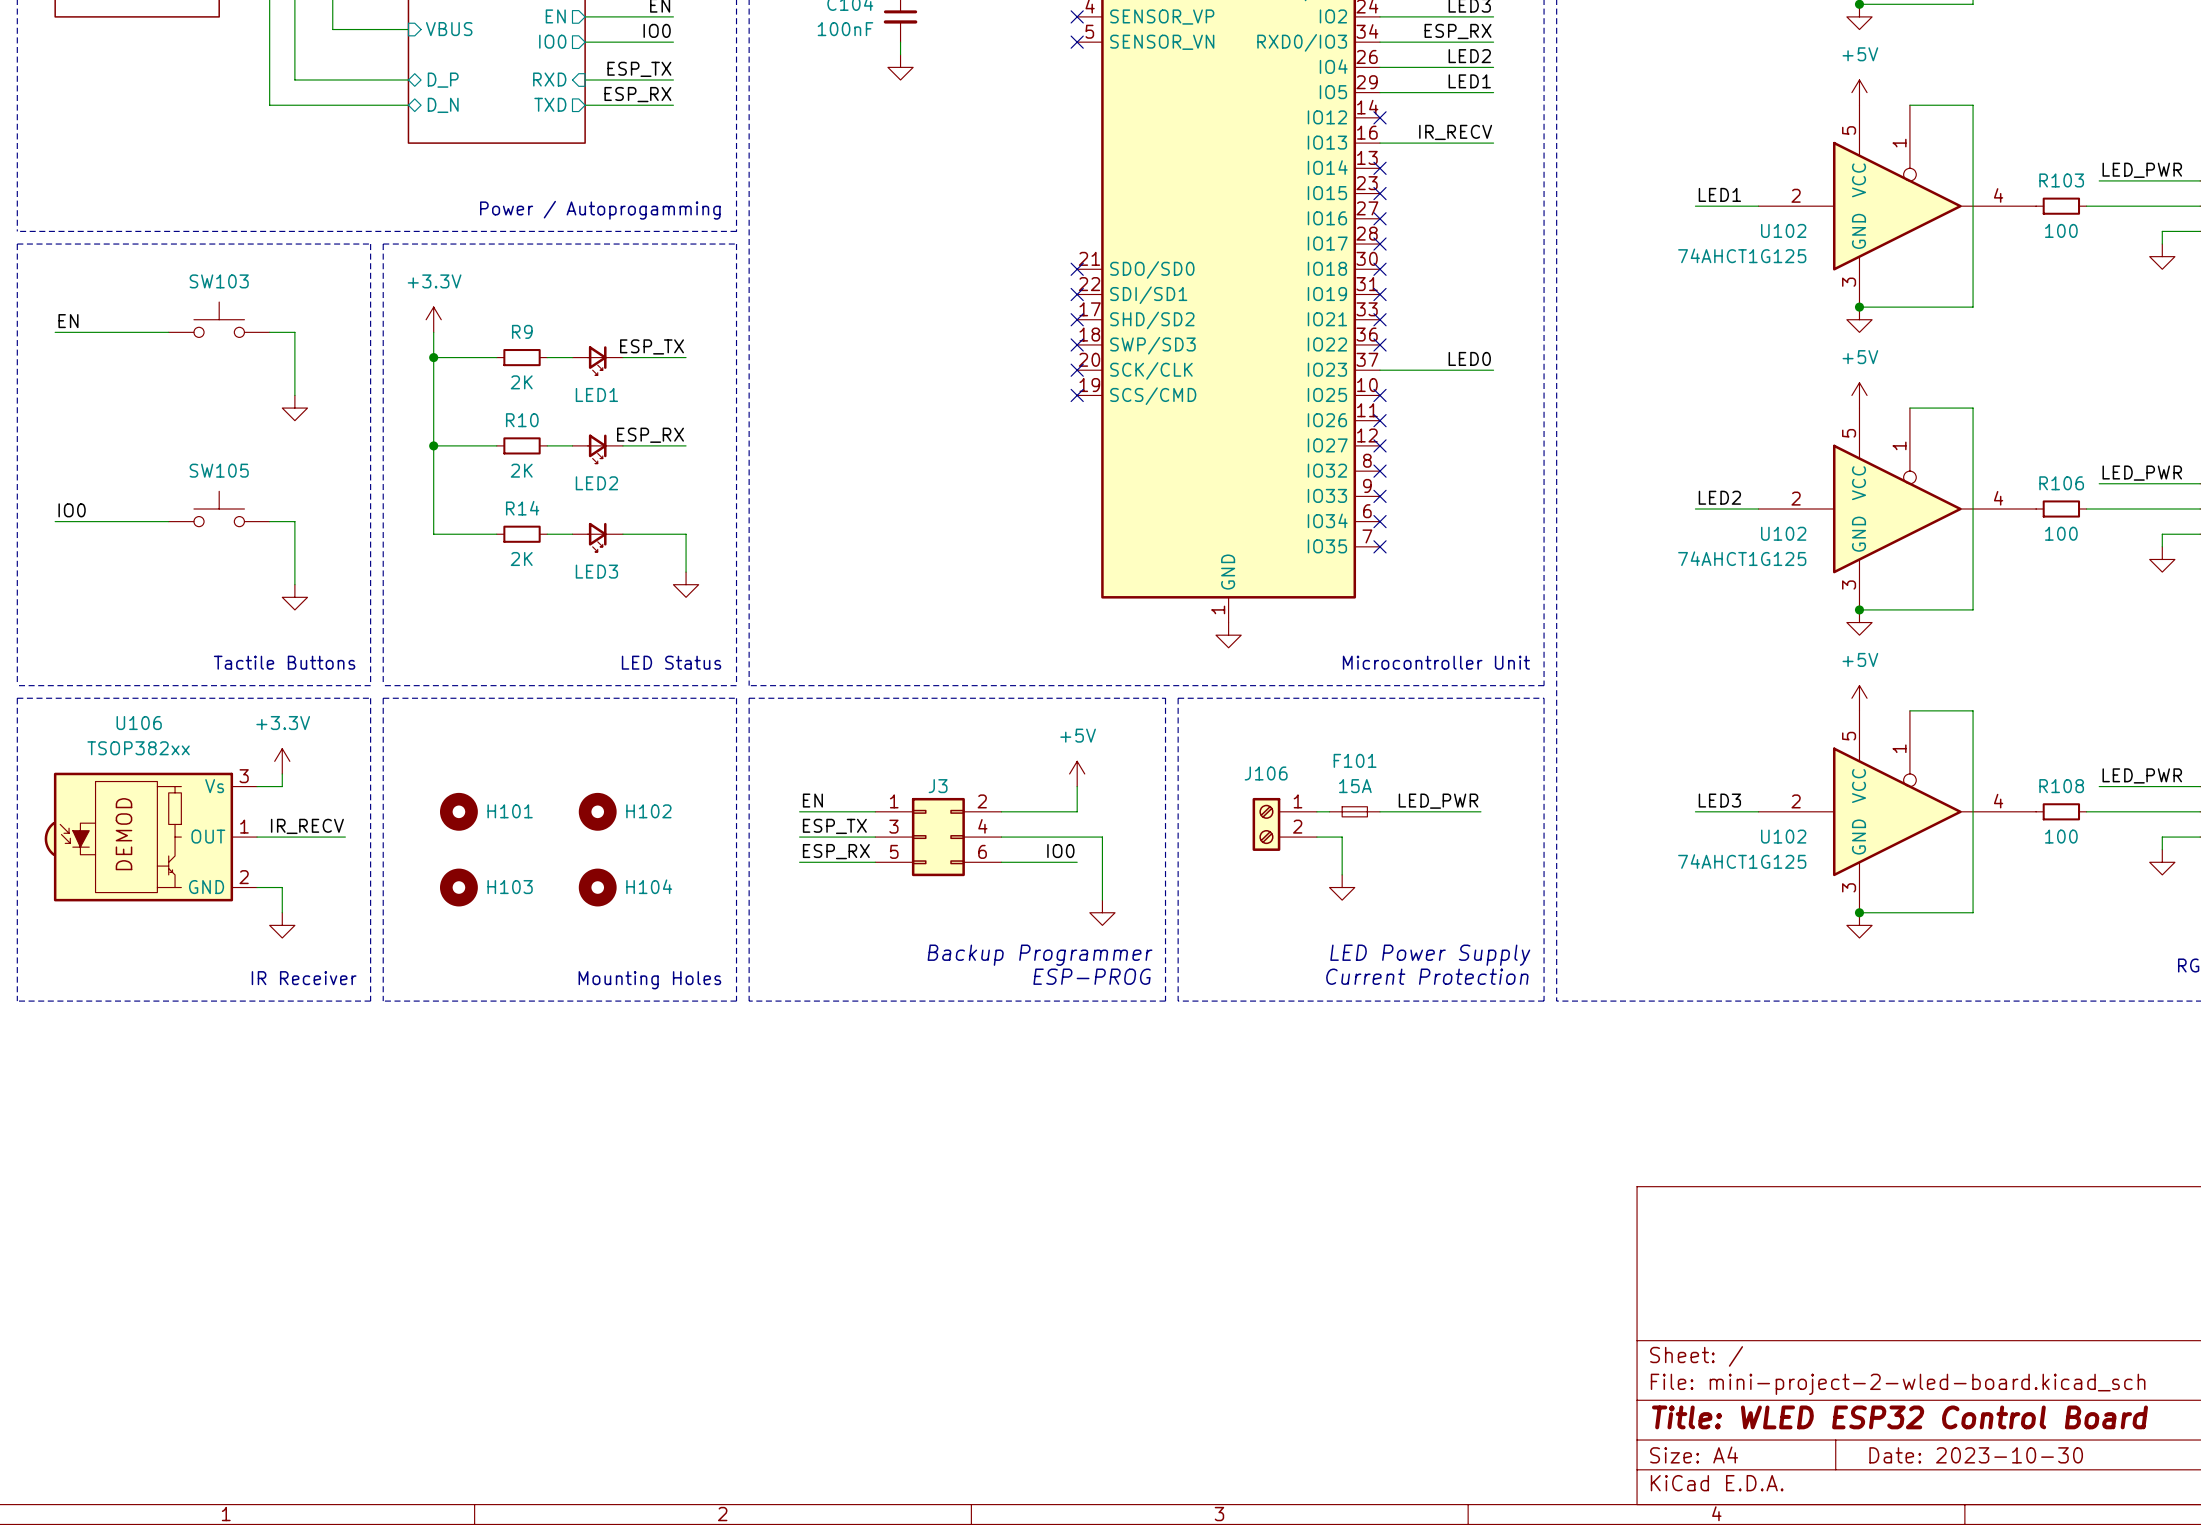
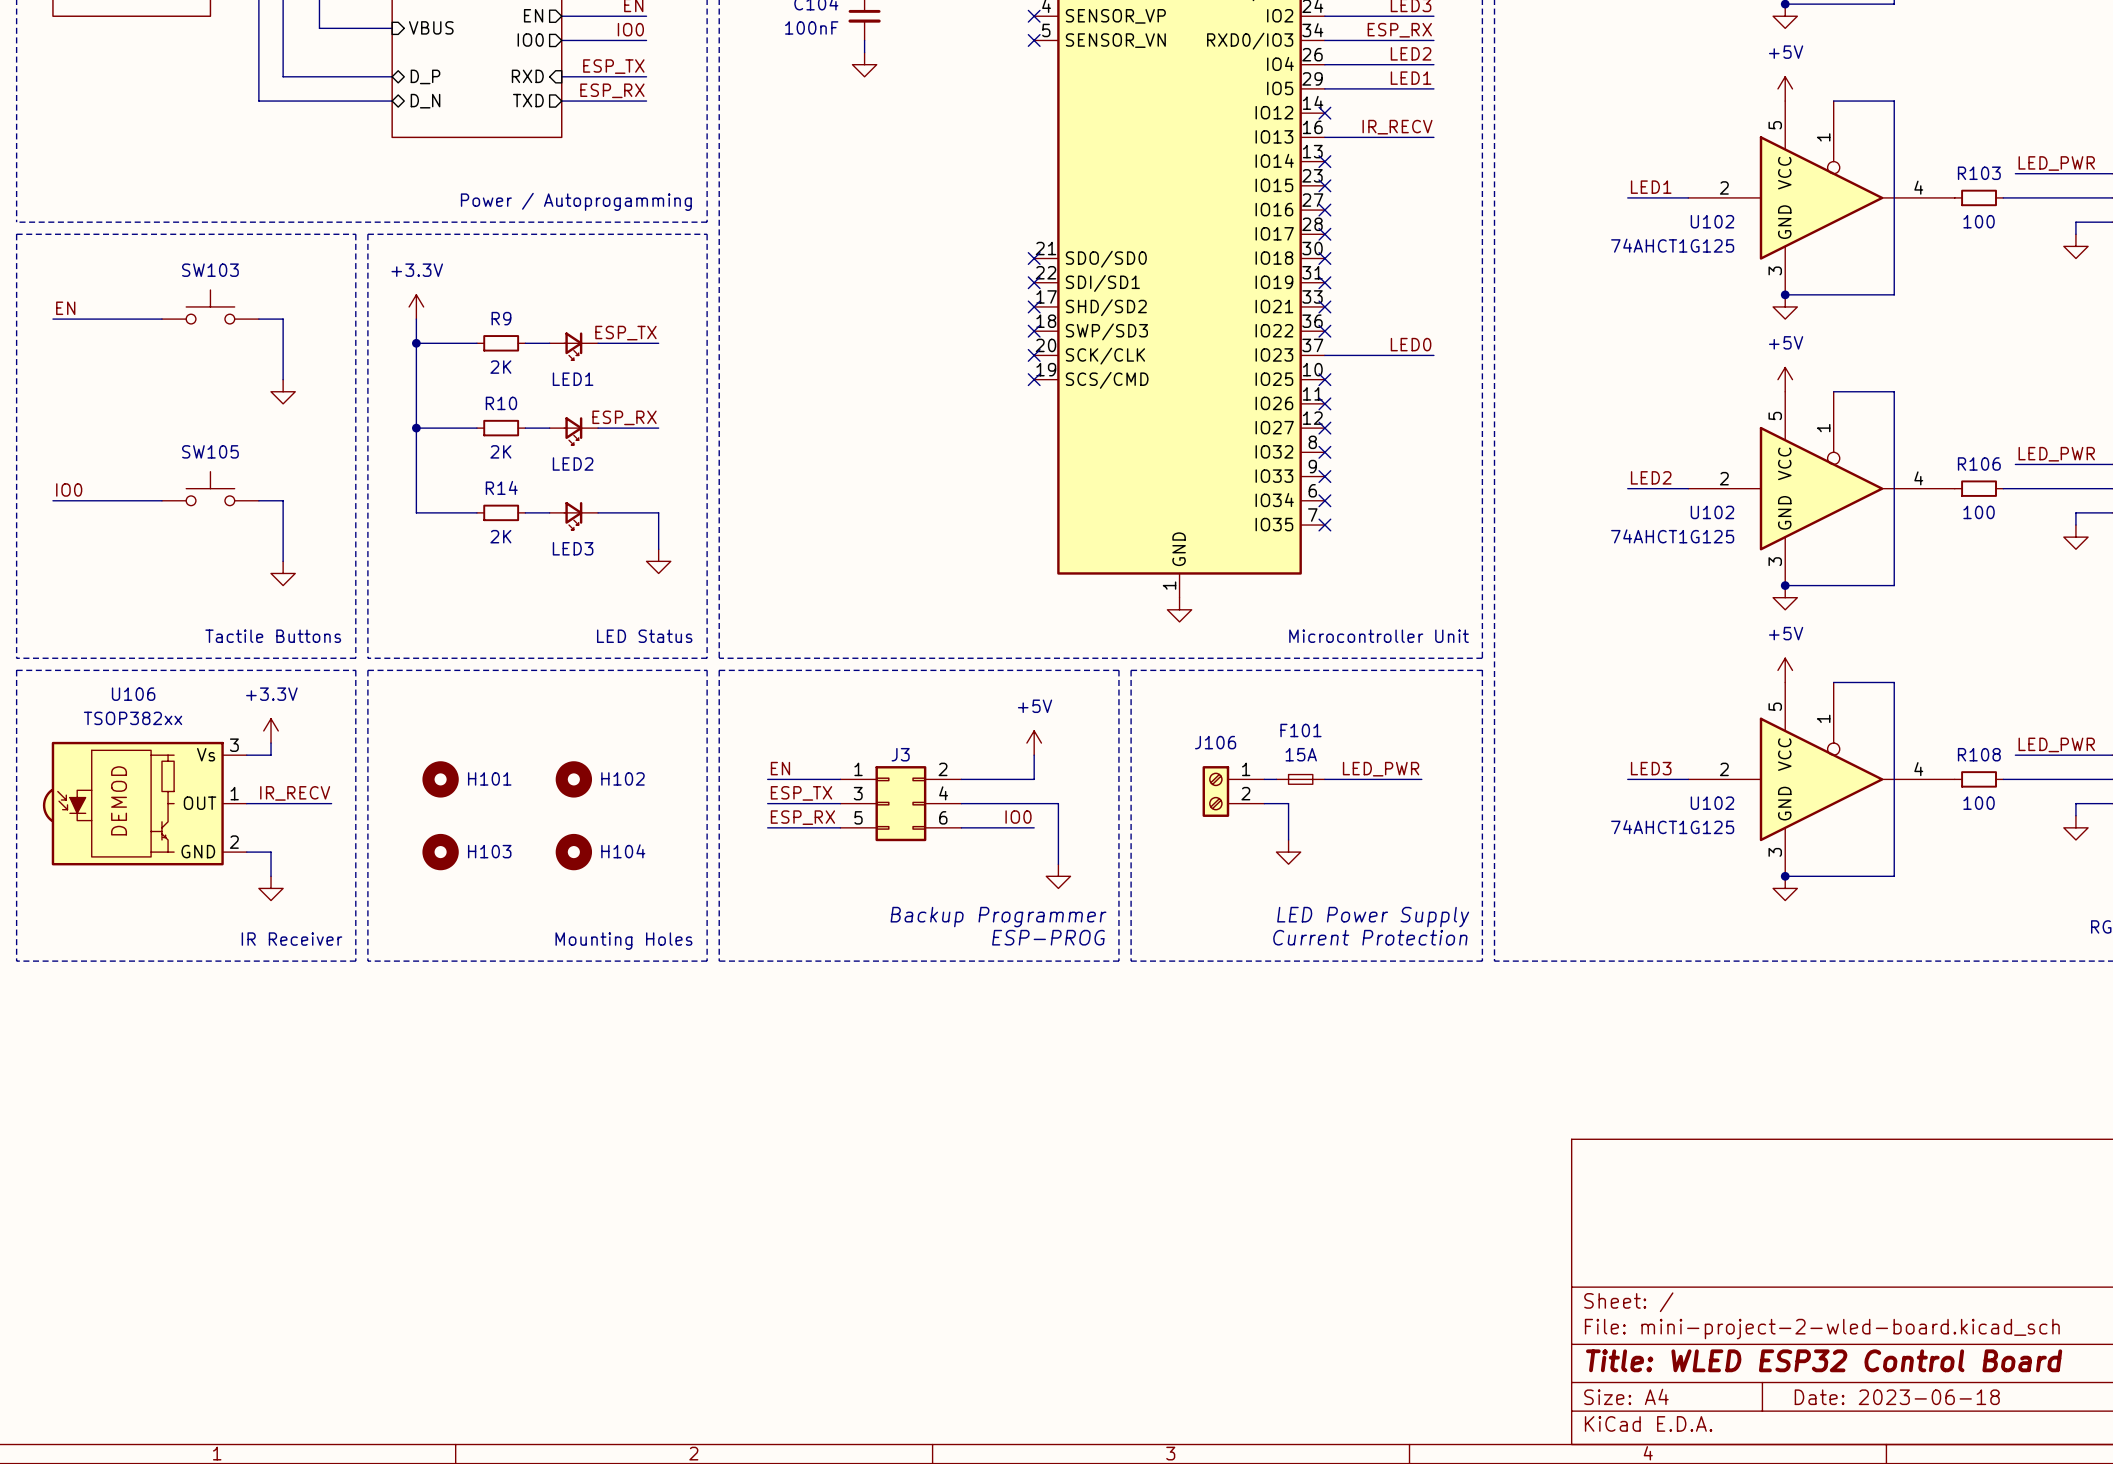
title block: Date: 2023-10-30 (1976, 1455) -> Date: 2023-06-18 (1897, 1397)

